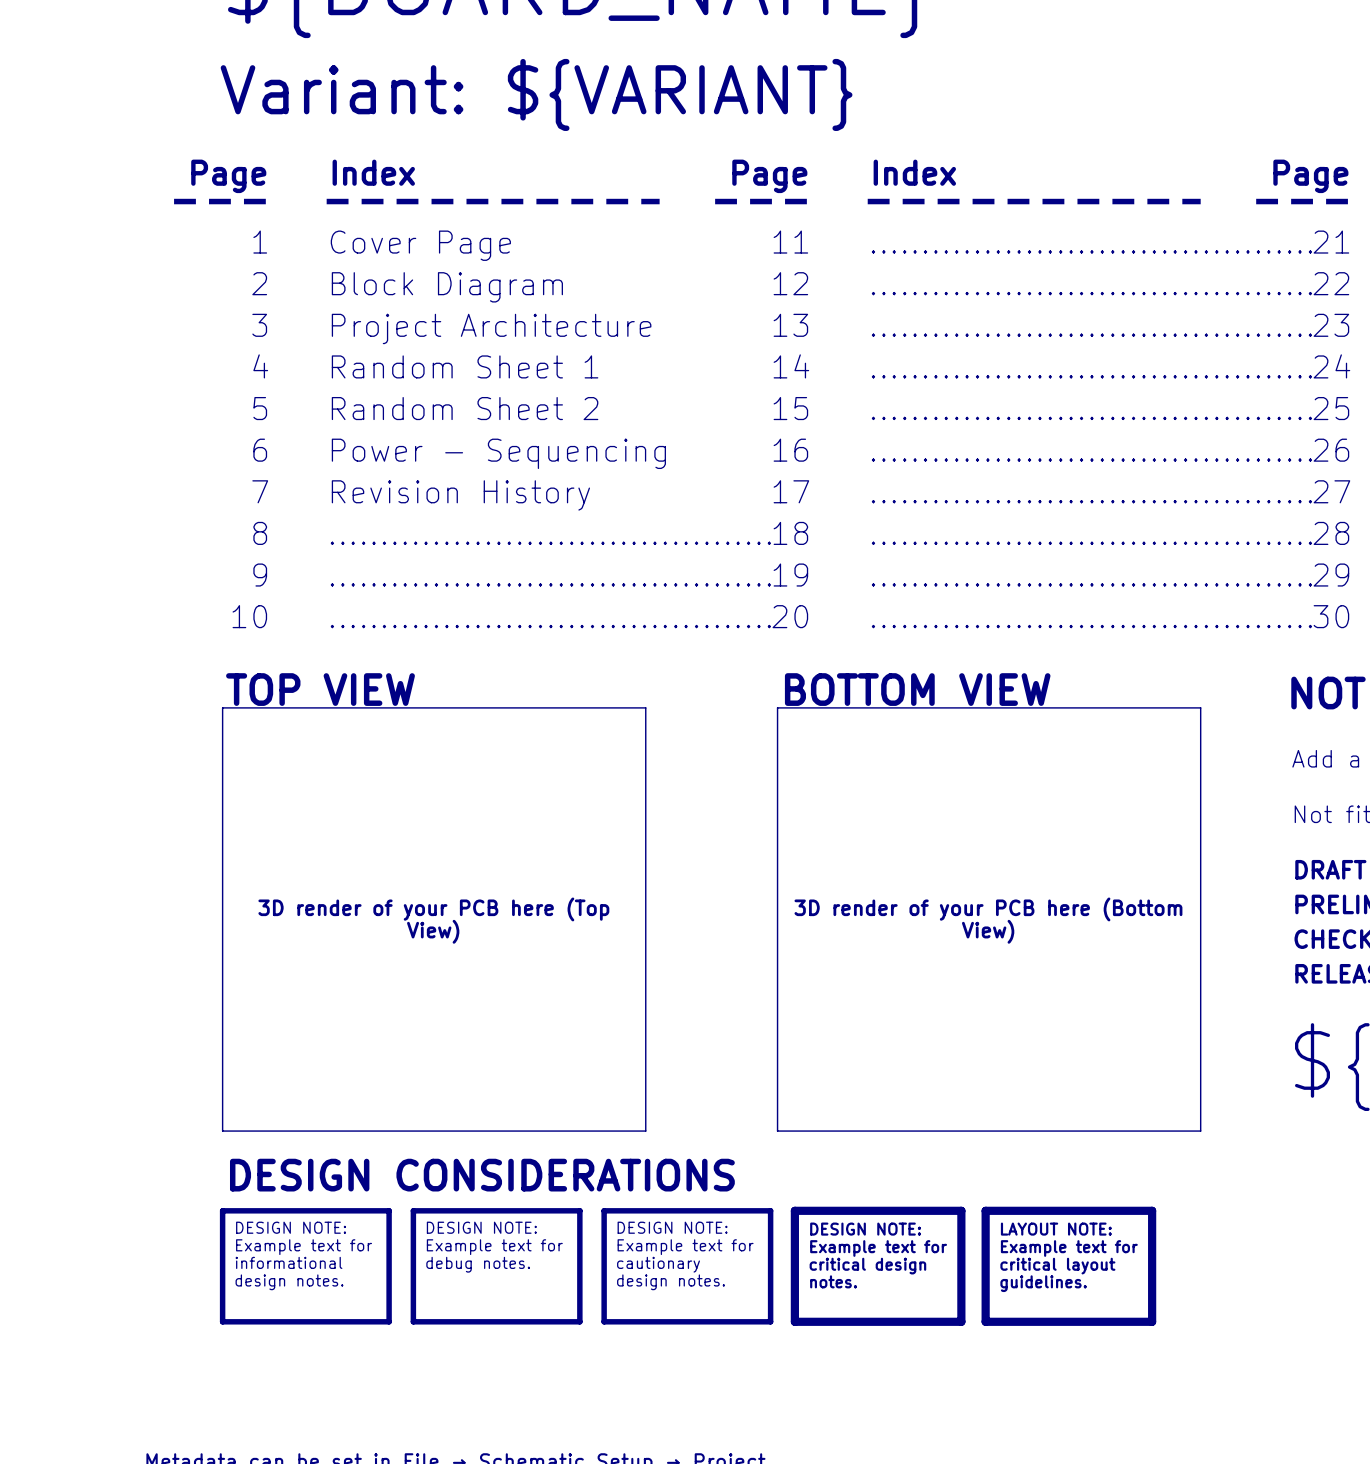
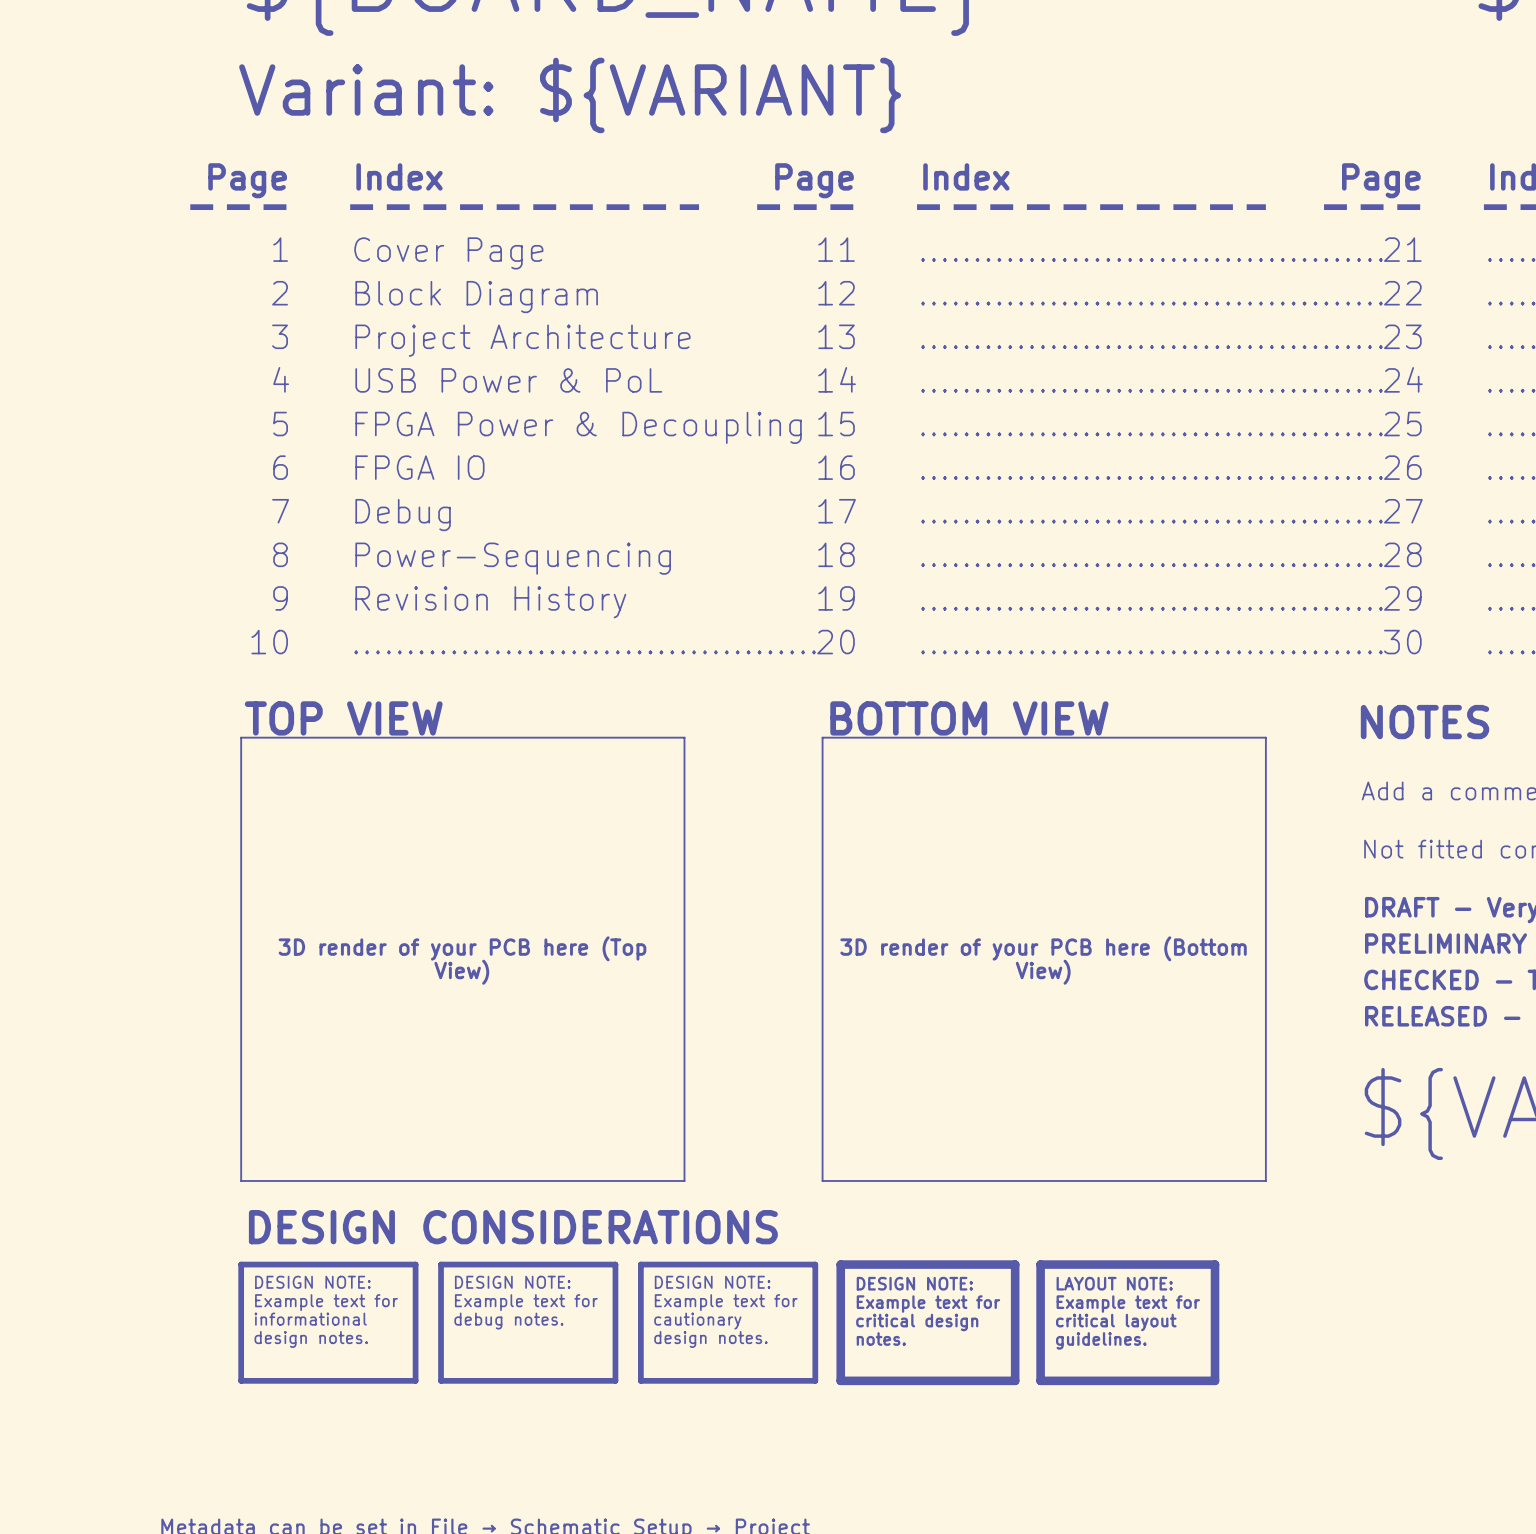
text: Random Sheet 1 (465, 366) -> USB Power & PoL (508, 380)
text: Random Sheet 2 (465, 408) -> FPGA Power & Decoupling (578, 427)
text: Power - Sequencing (498, 453) -> FPGA IO (419, 467)
text: Revision History (460, 495) -> Debug (403, 515)
text: ........................................... (550, 543) -> Power-Sequencing (513, 558)
text: ........................................... (550, 584) -> Revision History (490, 602)

